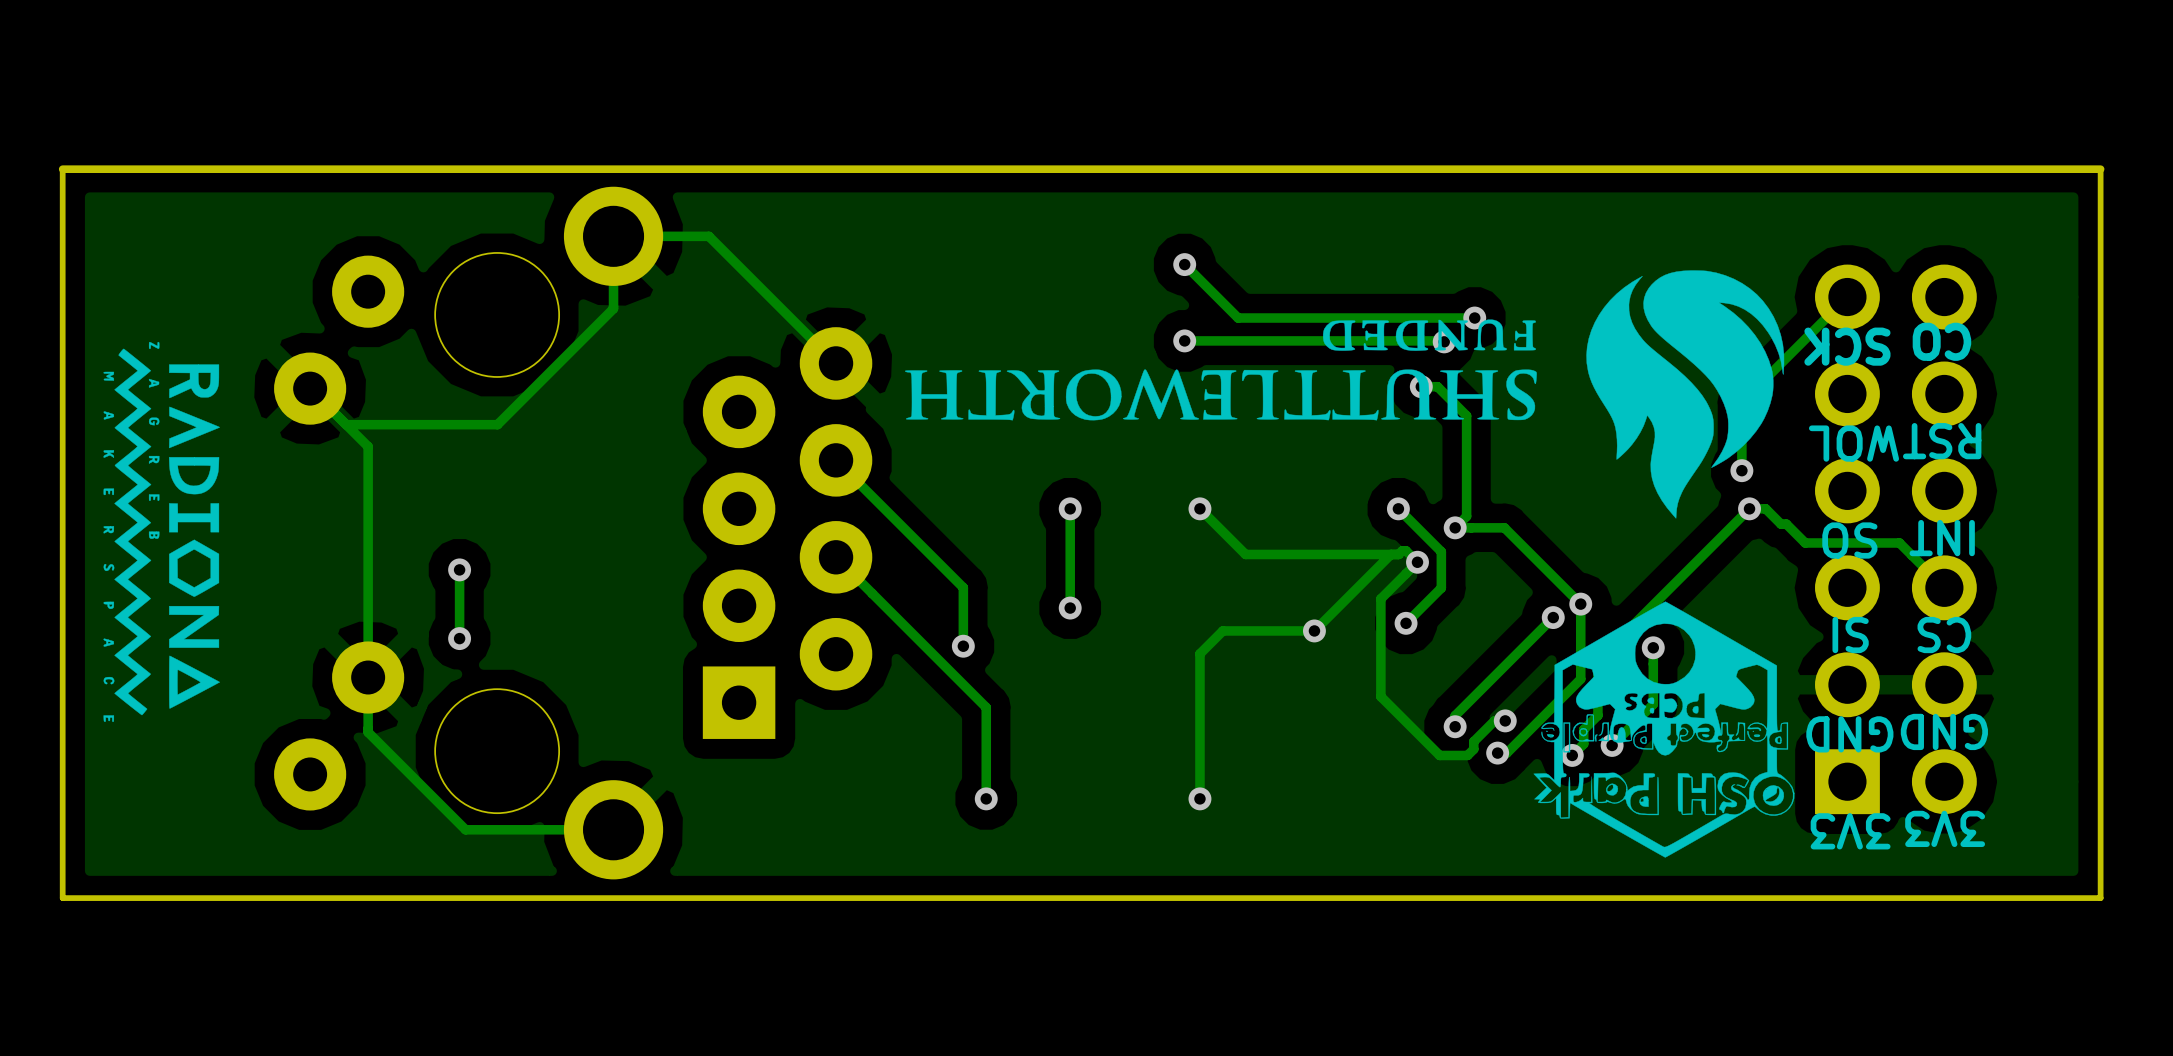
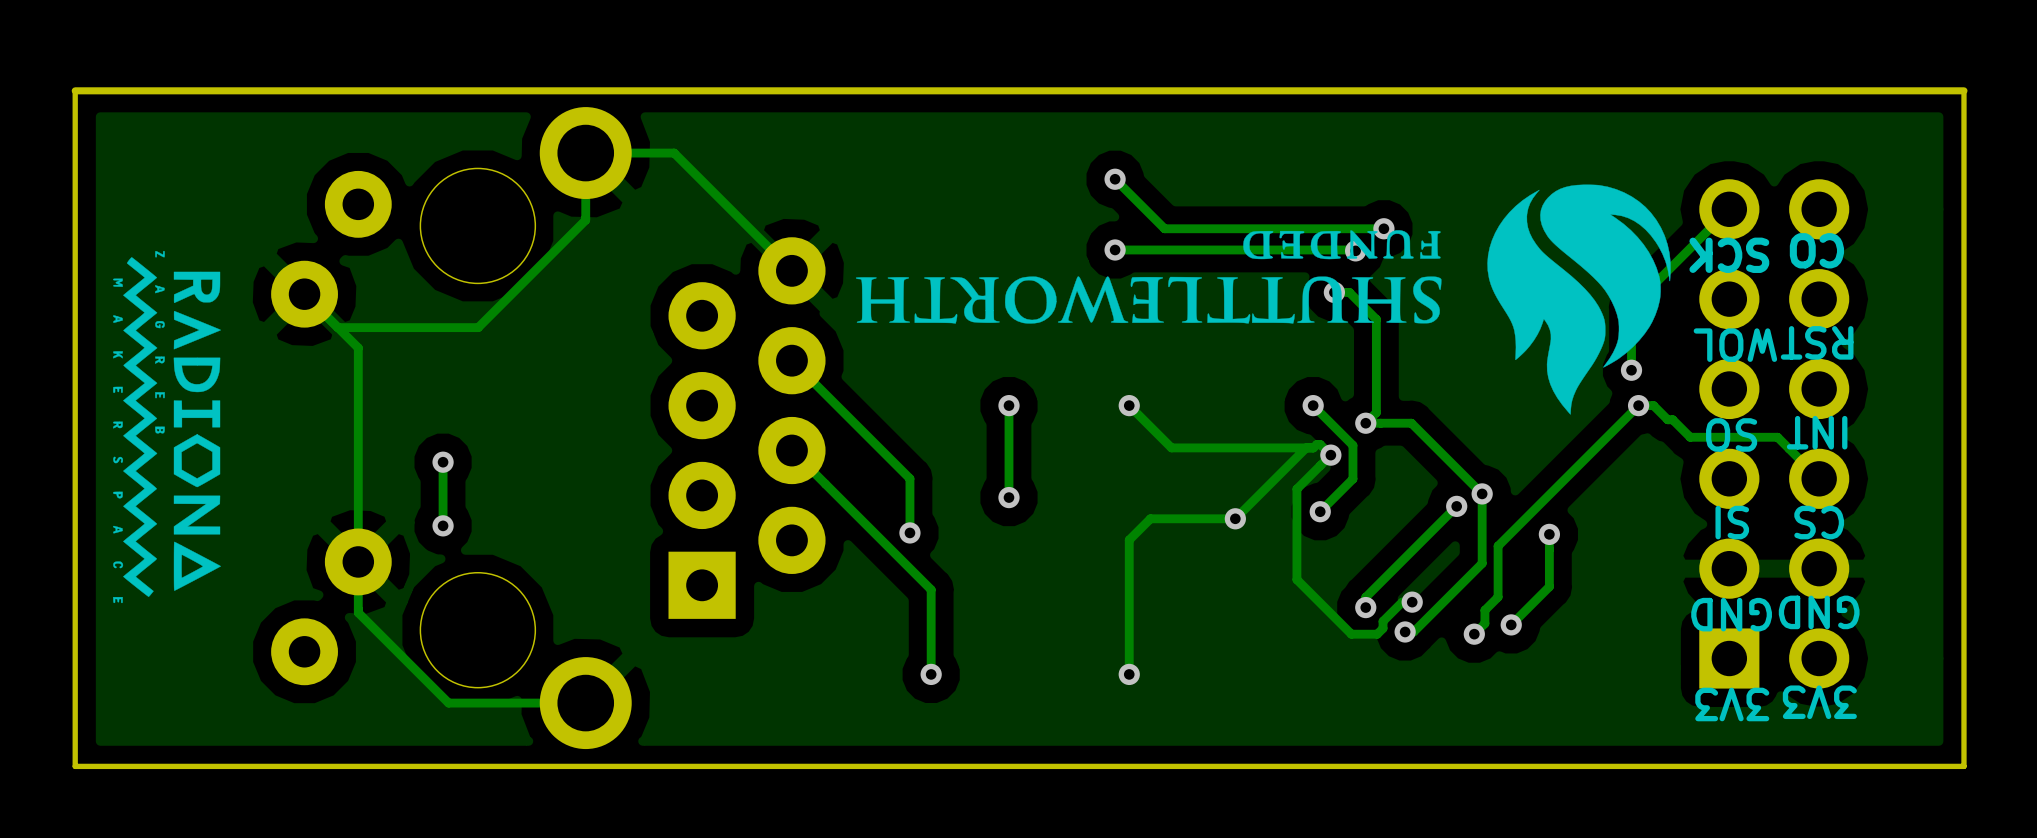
drawing: [1533, 601, 1795, 858] -> none

